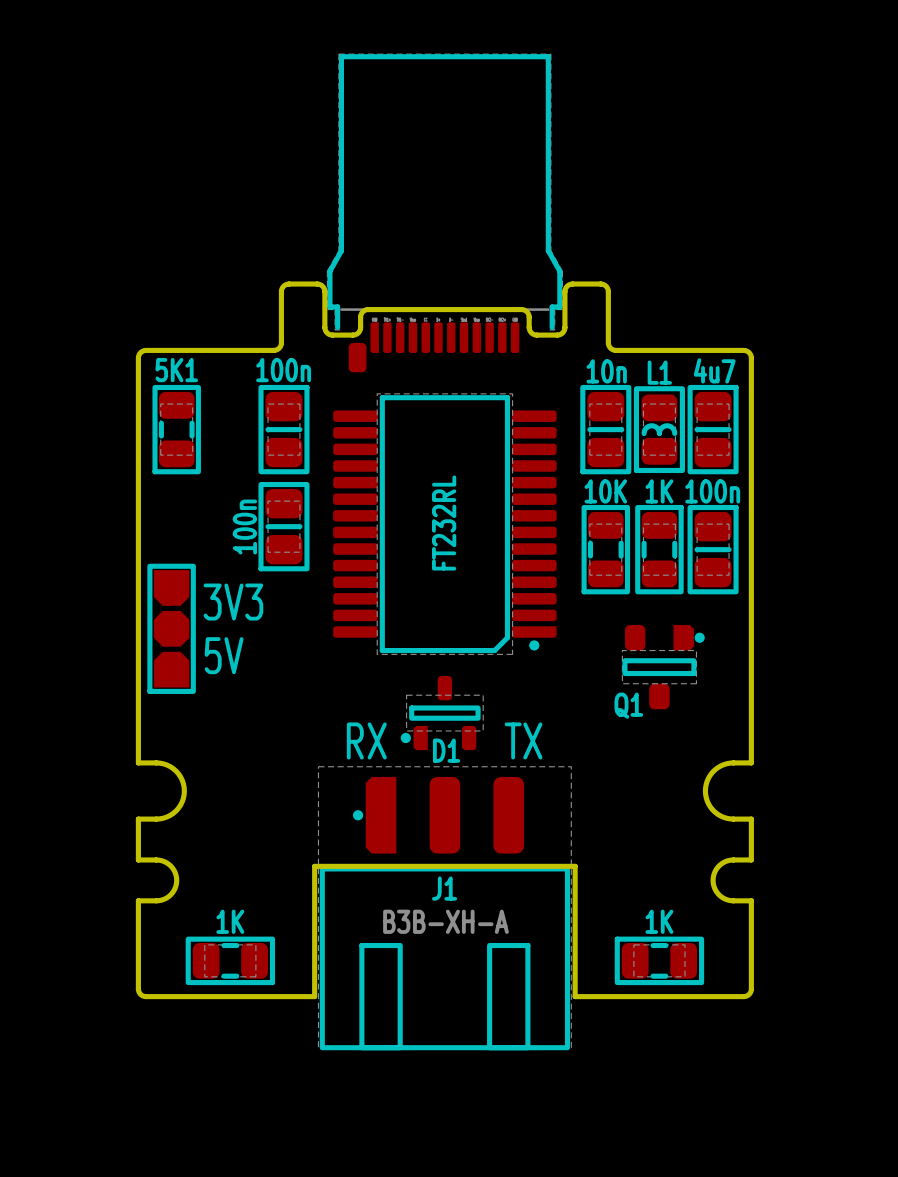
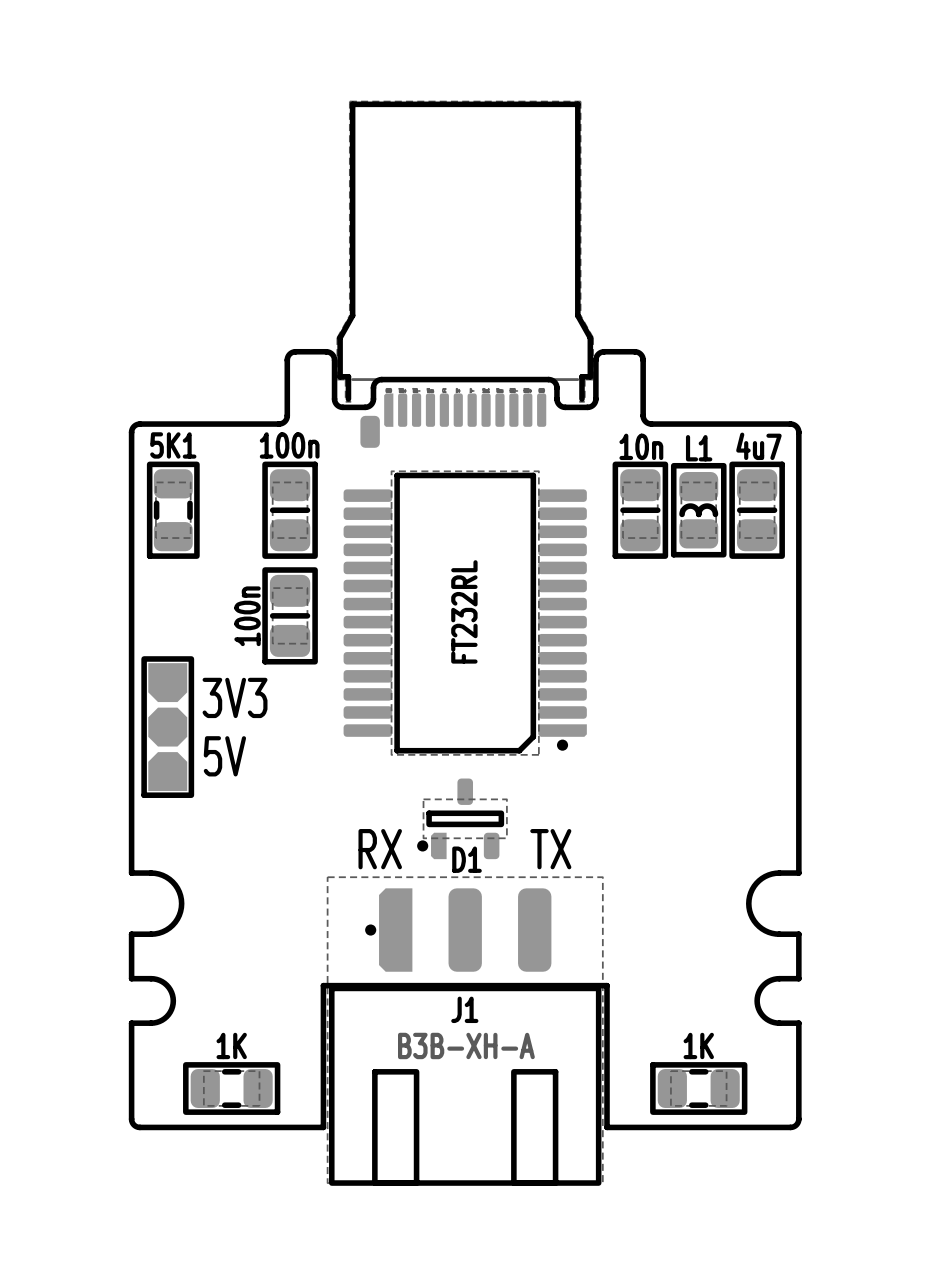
part: 10K (605, 549) -> none
part: 1K (659, 549) -> none
part: 100n (713, 549) -> none
Q1: (663, 667) -> none

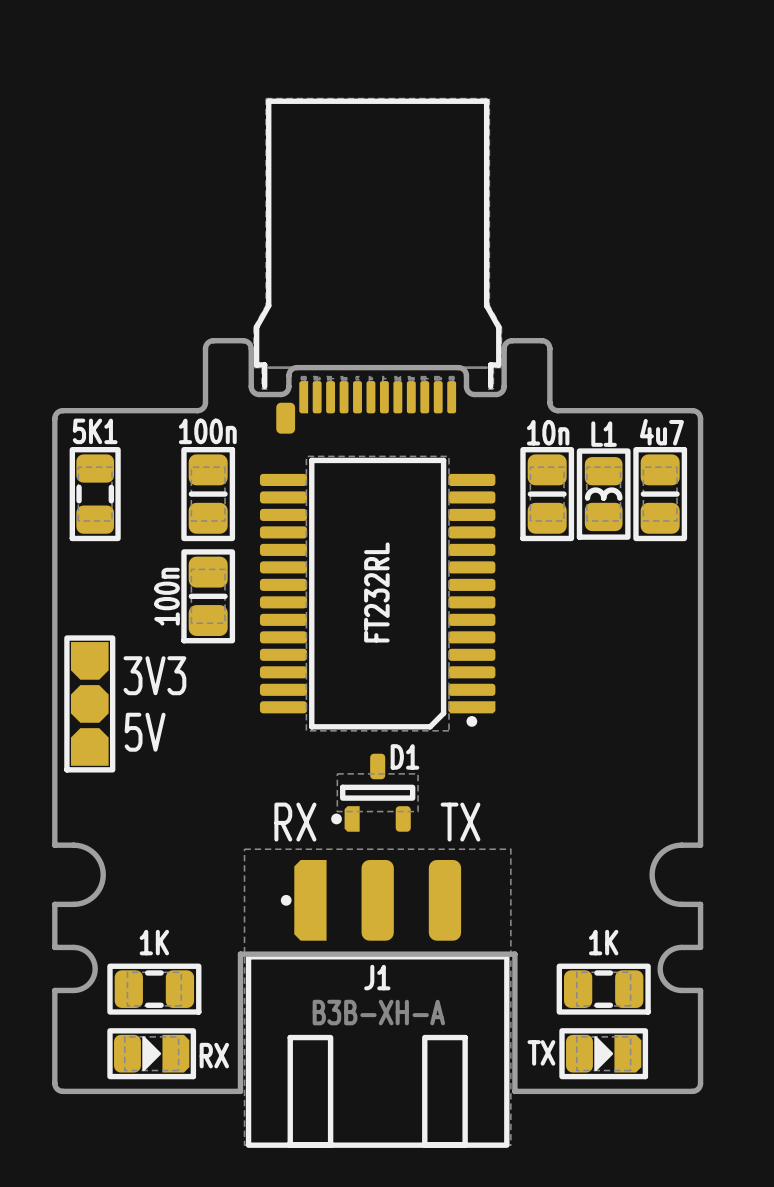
D1 name position: D1 (467, 859) -> D1 (404, 756)
part: none -> 1K (154, 989)
part: none -> 1K (603, 989)
part value: 1K (231, 1045) -> RX (214, 1055)
part value: 1K (698, 1045) -> TX (541, 1052)
part footprint: [183, 1062, 281, 1115] -> [107, 1028, 197, 1080]
part footprint: [650, 1062, 748, 1115] -> [559, 1028, 649, 1080]

